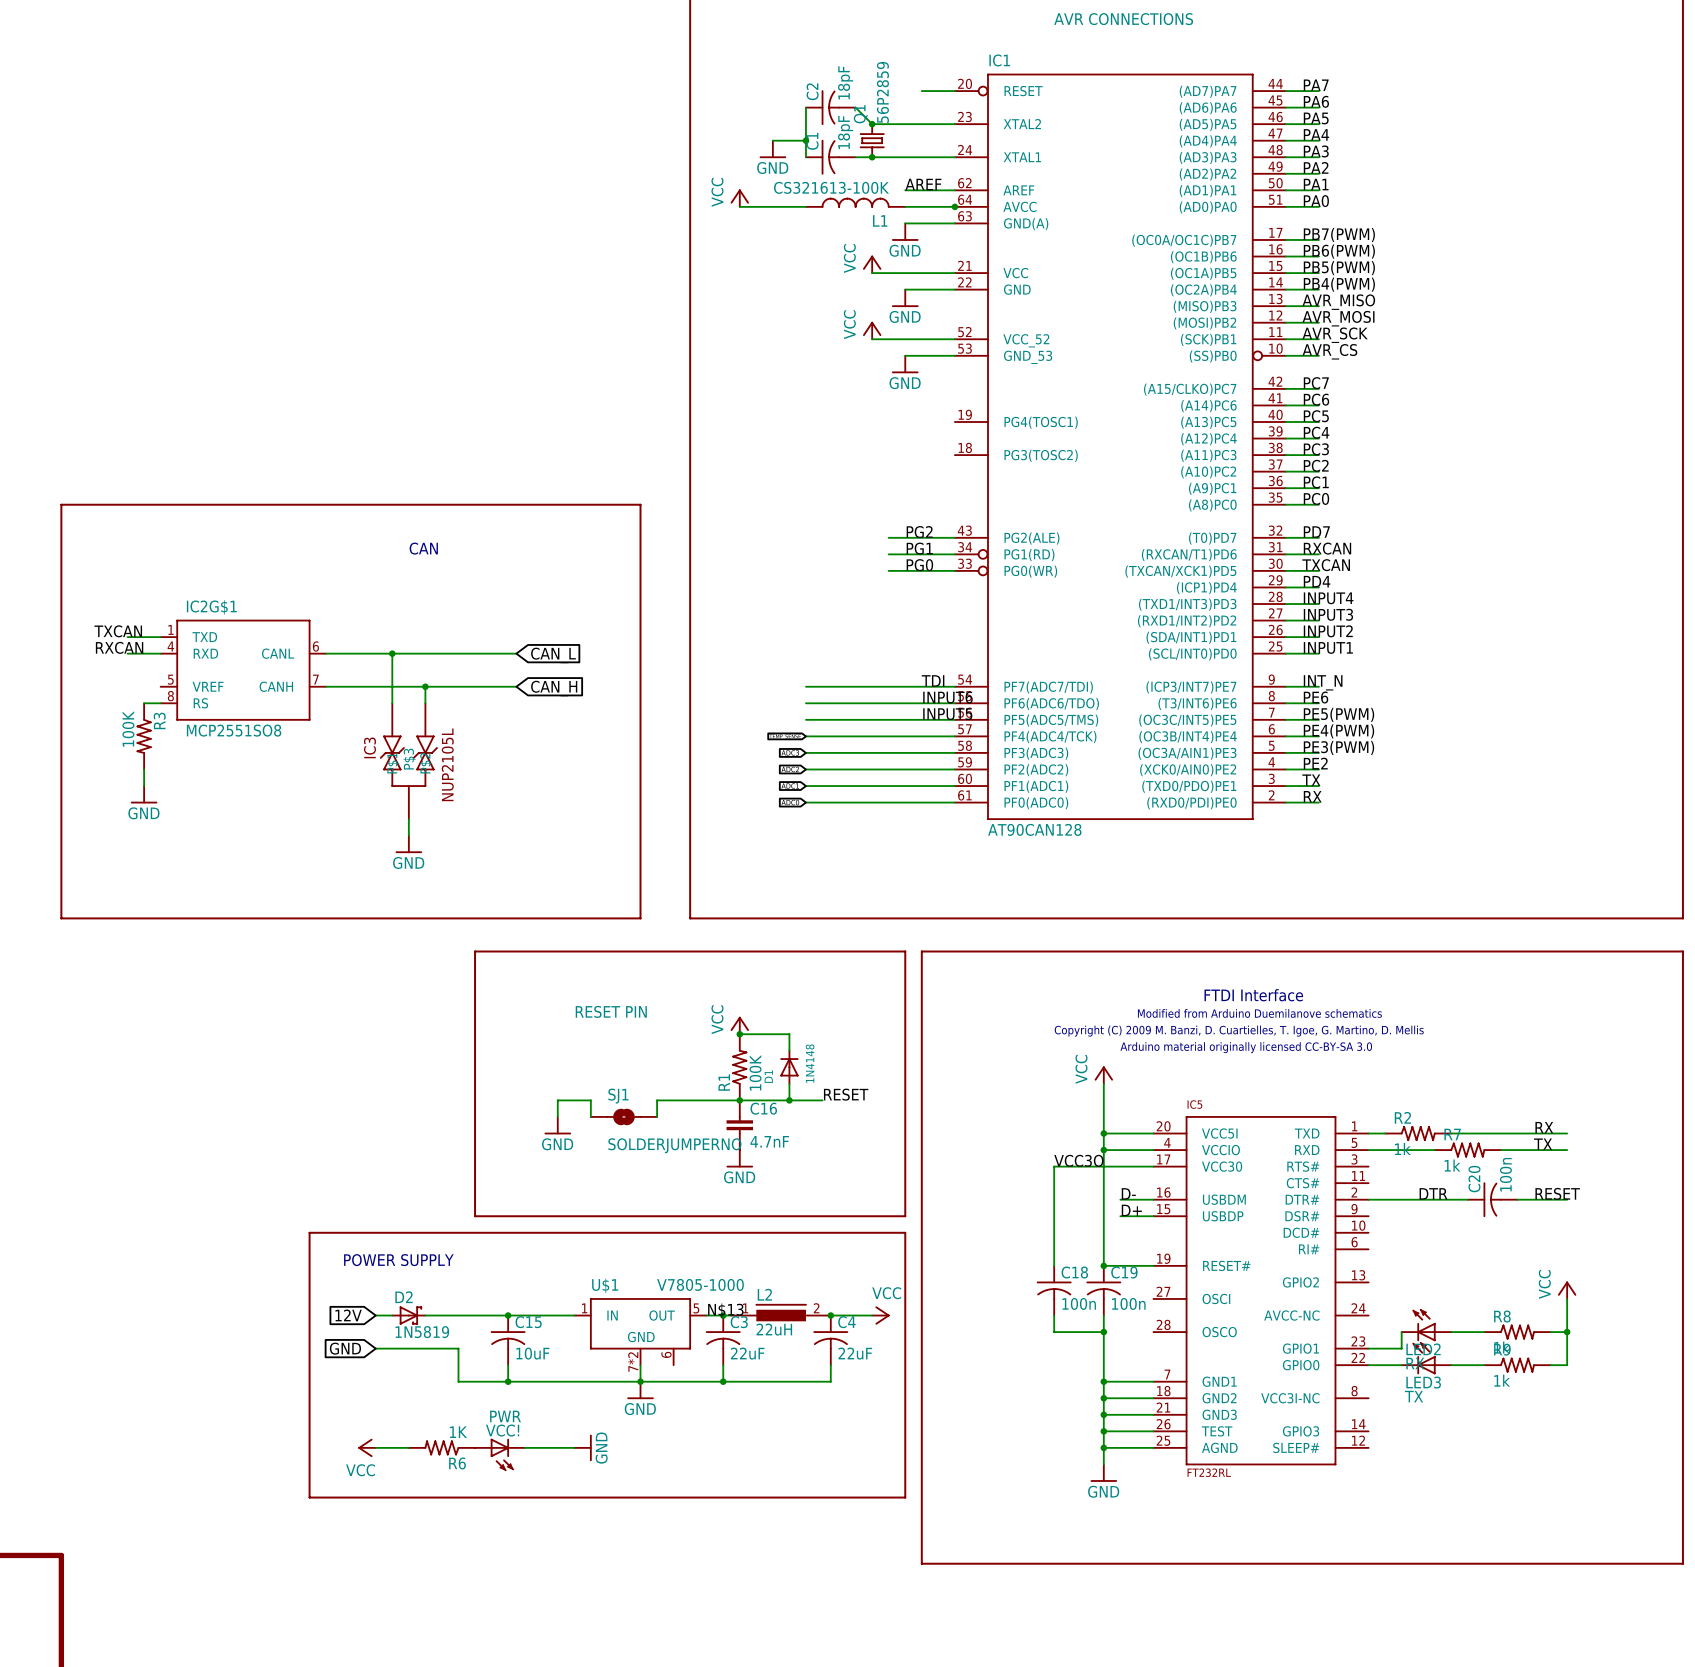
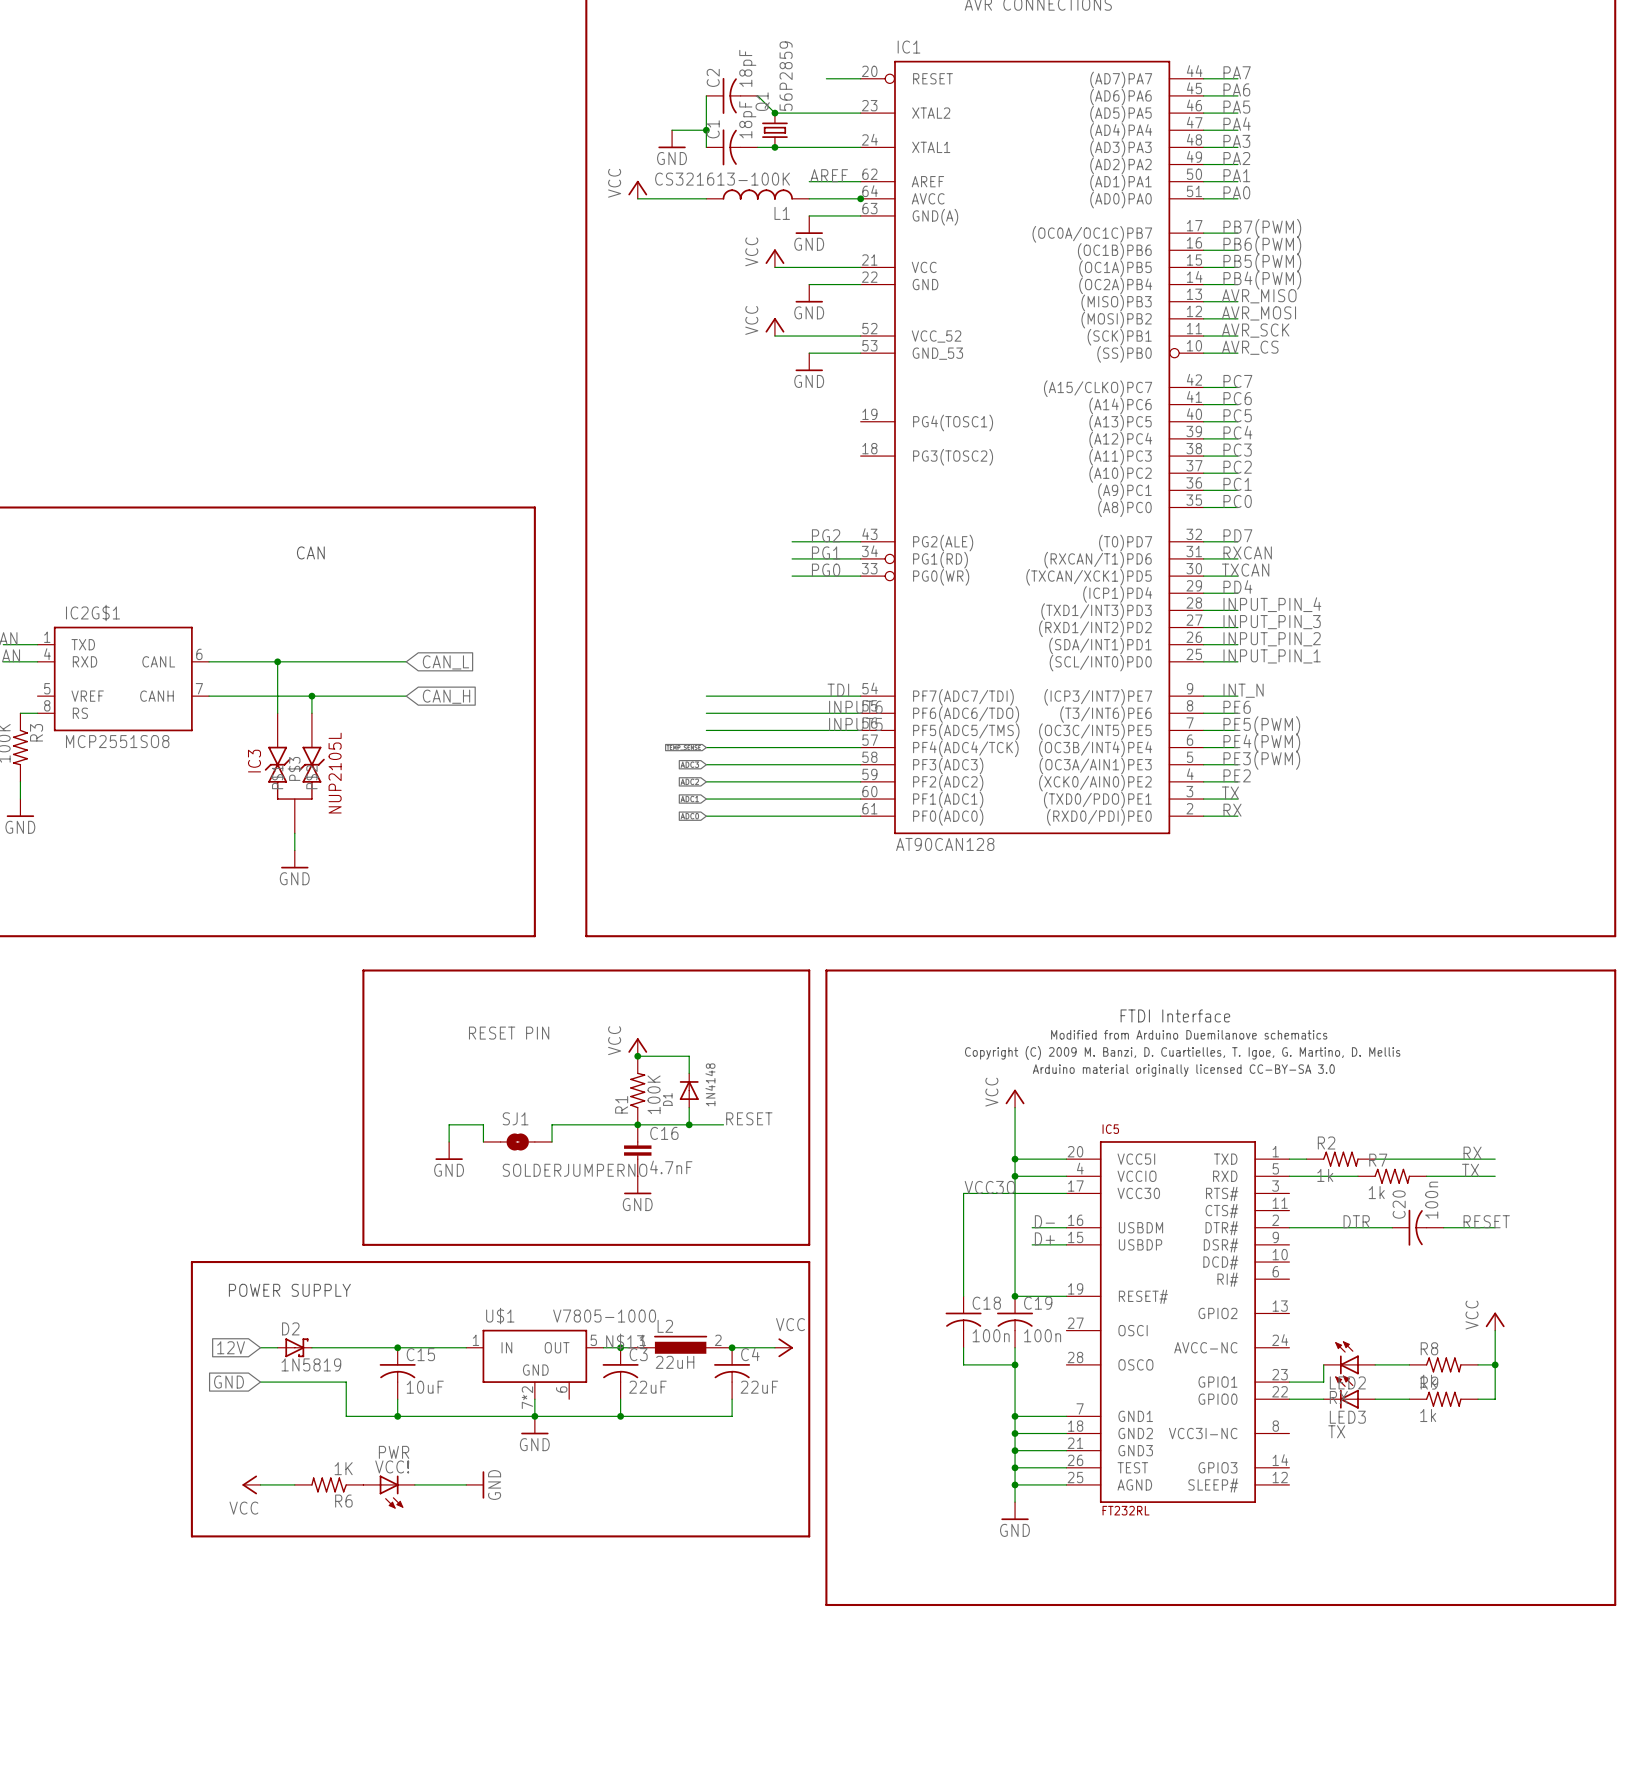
label: INPUT4 (1328, 598) -> INPUT_PIN_4 (1272, 604)
label: INPUT3 (1328, 614) -> INPUT_PIN_3 (1272, 622)
label: INPUT2 (1328, 631) -> INPUT_PIN_2 (1272, 639)
label: INPUT1 (1328, 647) -> INPUT_PIN_1 (1272, 656)

